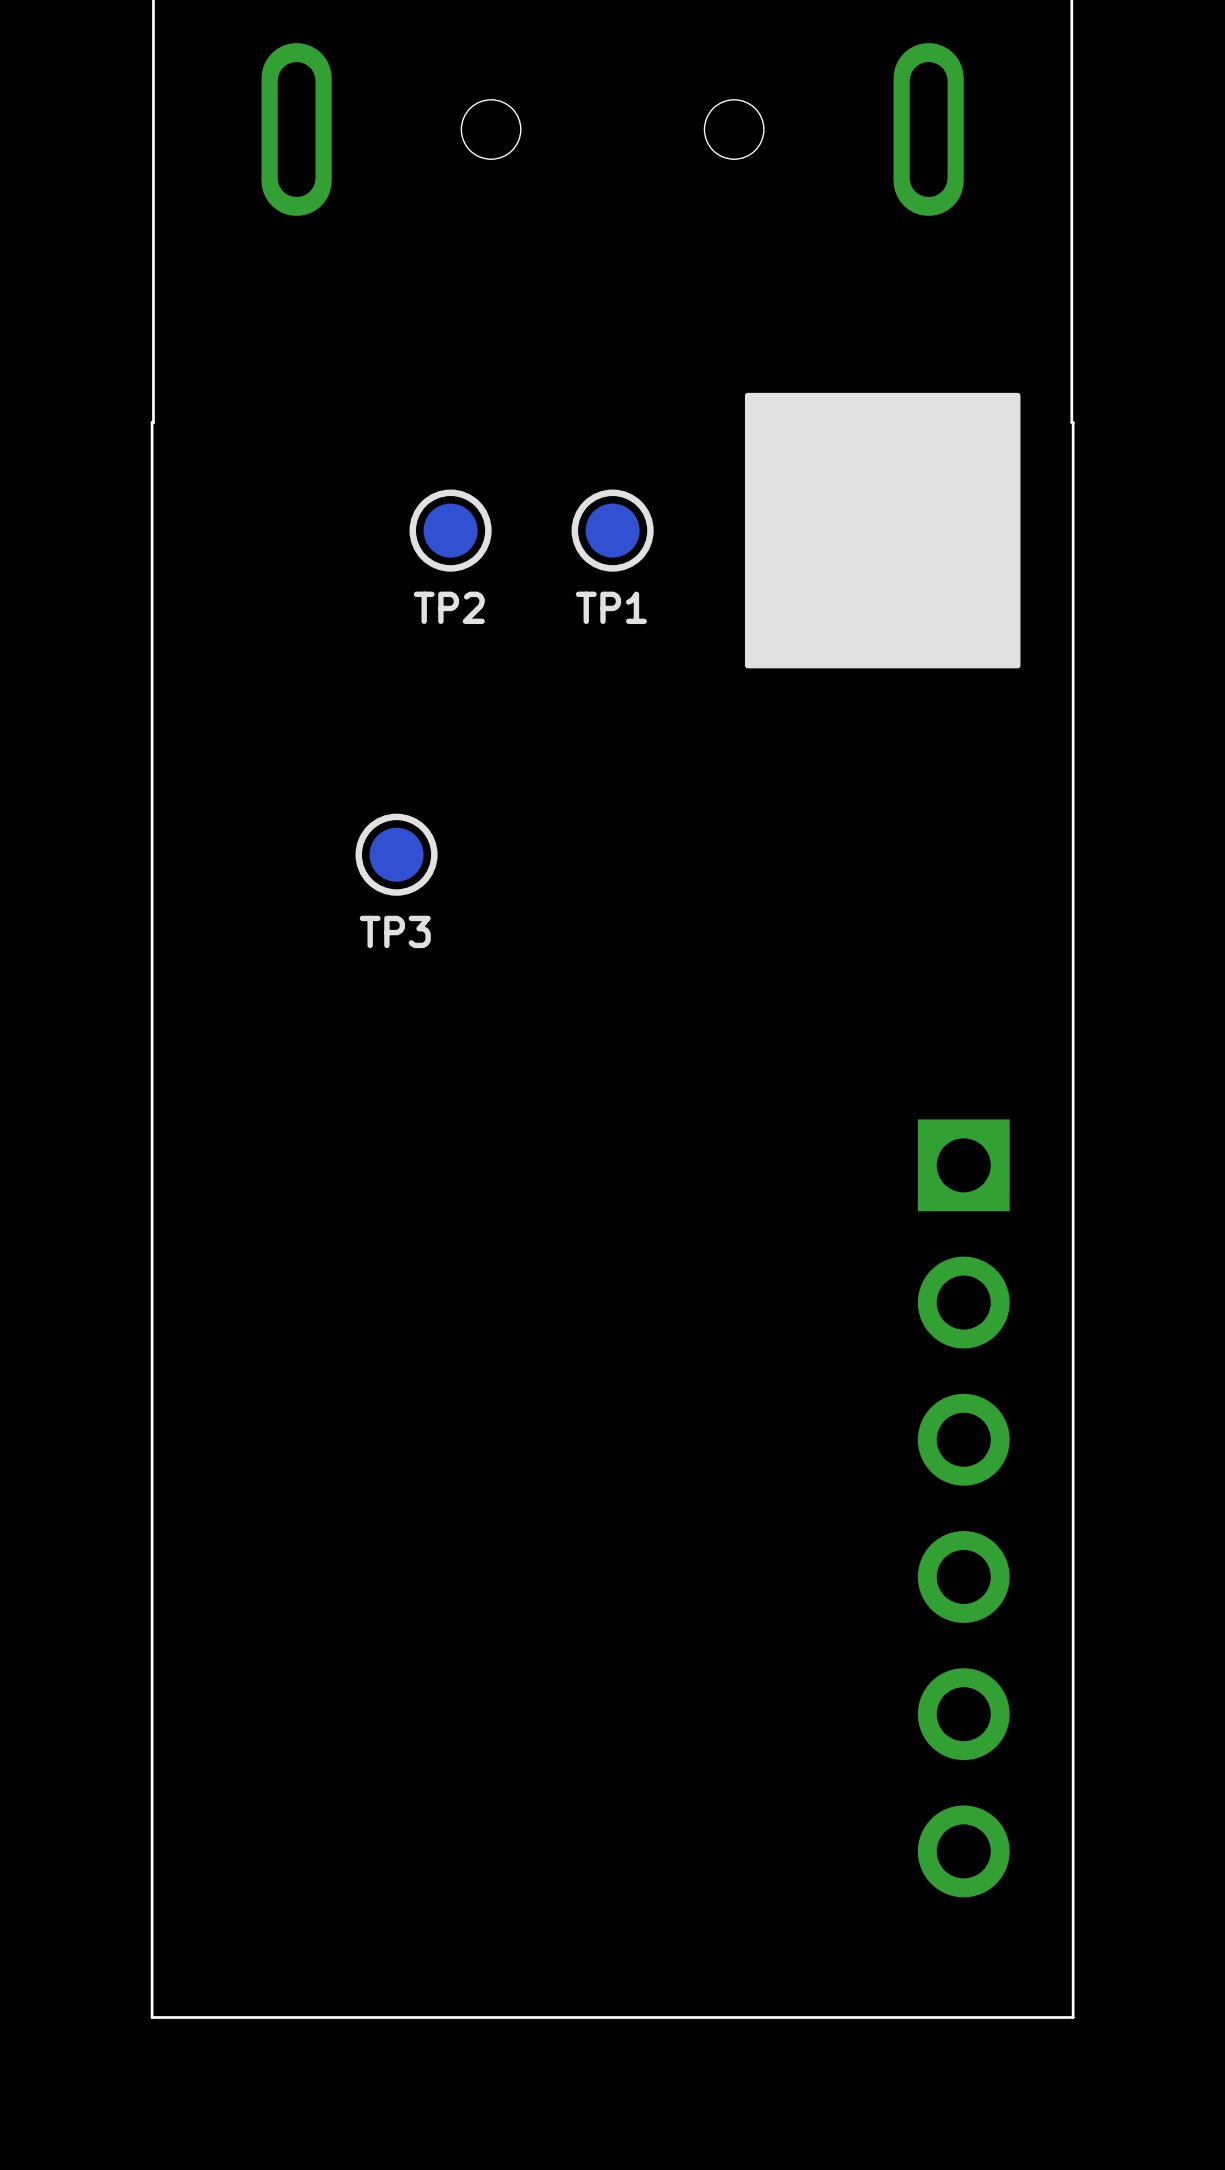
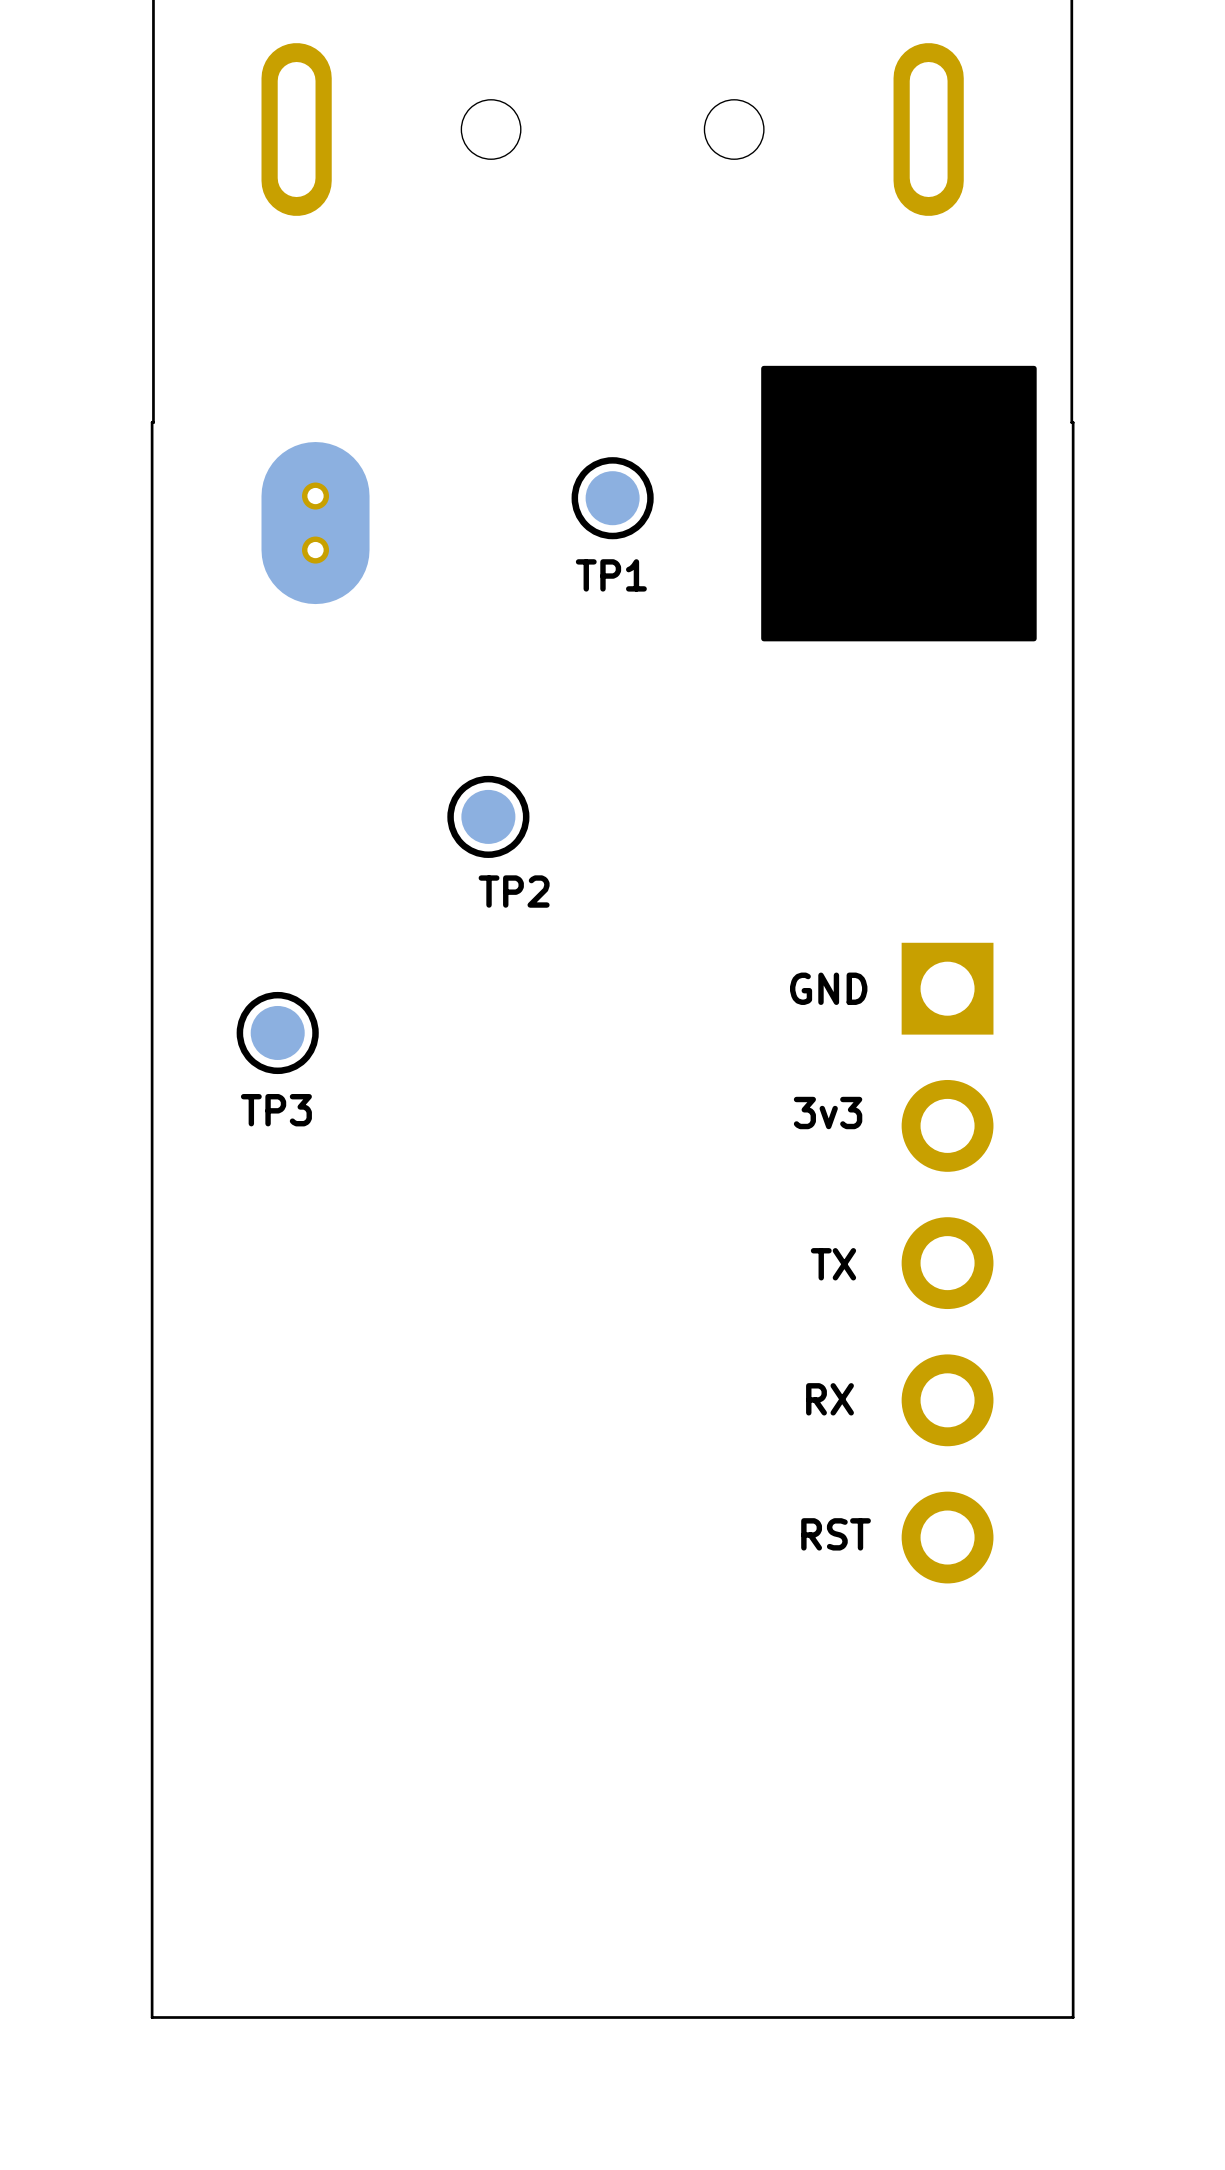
part: none -> (315, 523)
TP2 position: (450, 530) -> (488, 816)
TP1 position: (612, 530) -> (612, 498)
drawing position: (882, 530) -> (898, 503)
TP2 name position: TP2 (449, 607) -> TP2 (514, 891)
TP3 position: (396, 854) -> (277, 1032)
text: none -> GND (828, 988)
text: none -> 3v3 (828, 1113)
part: none -> (947, 1263)
text: none -> TX (833, 1264)
text: none -> RX (829, 1399)
part: (963, 1508) -> none
text: none -> RST (836, 1534)

